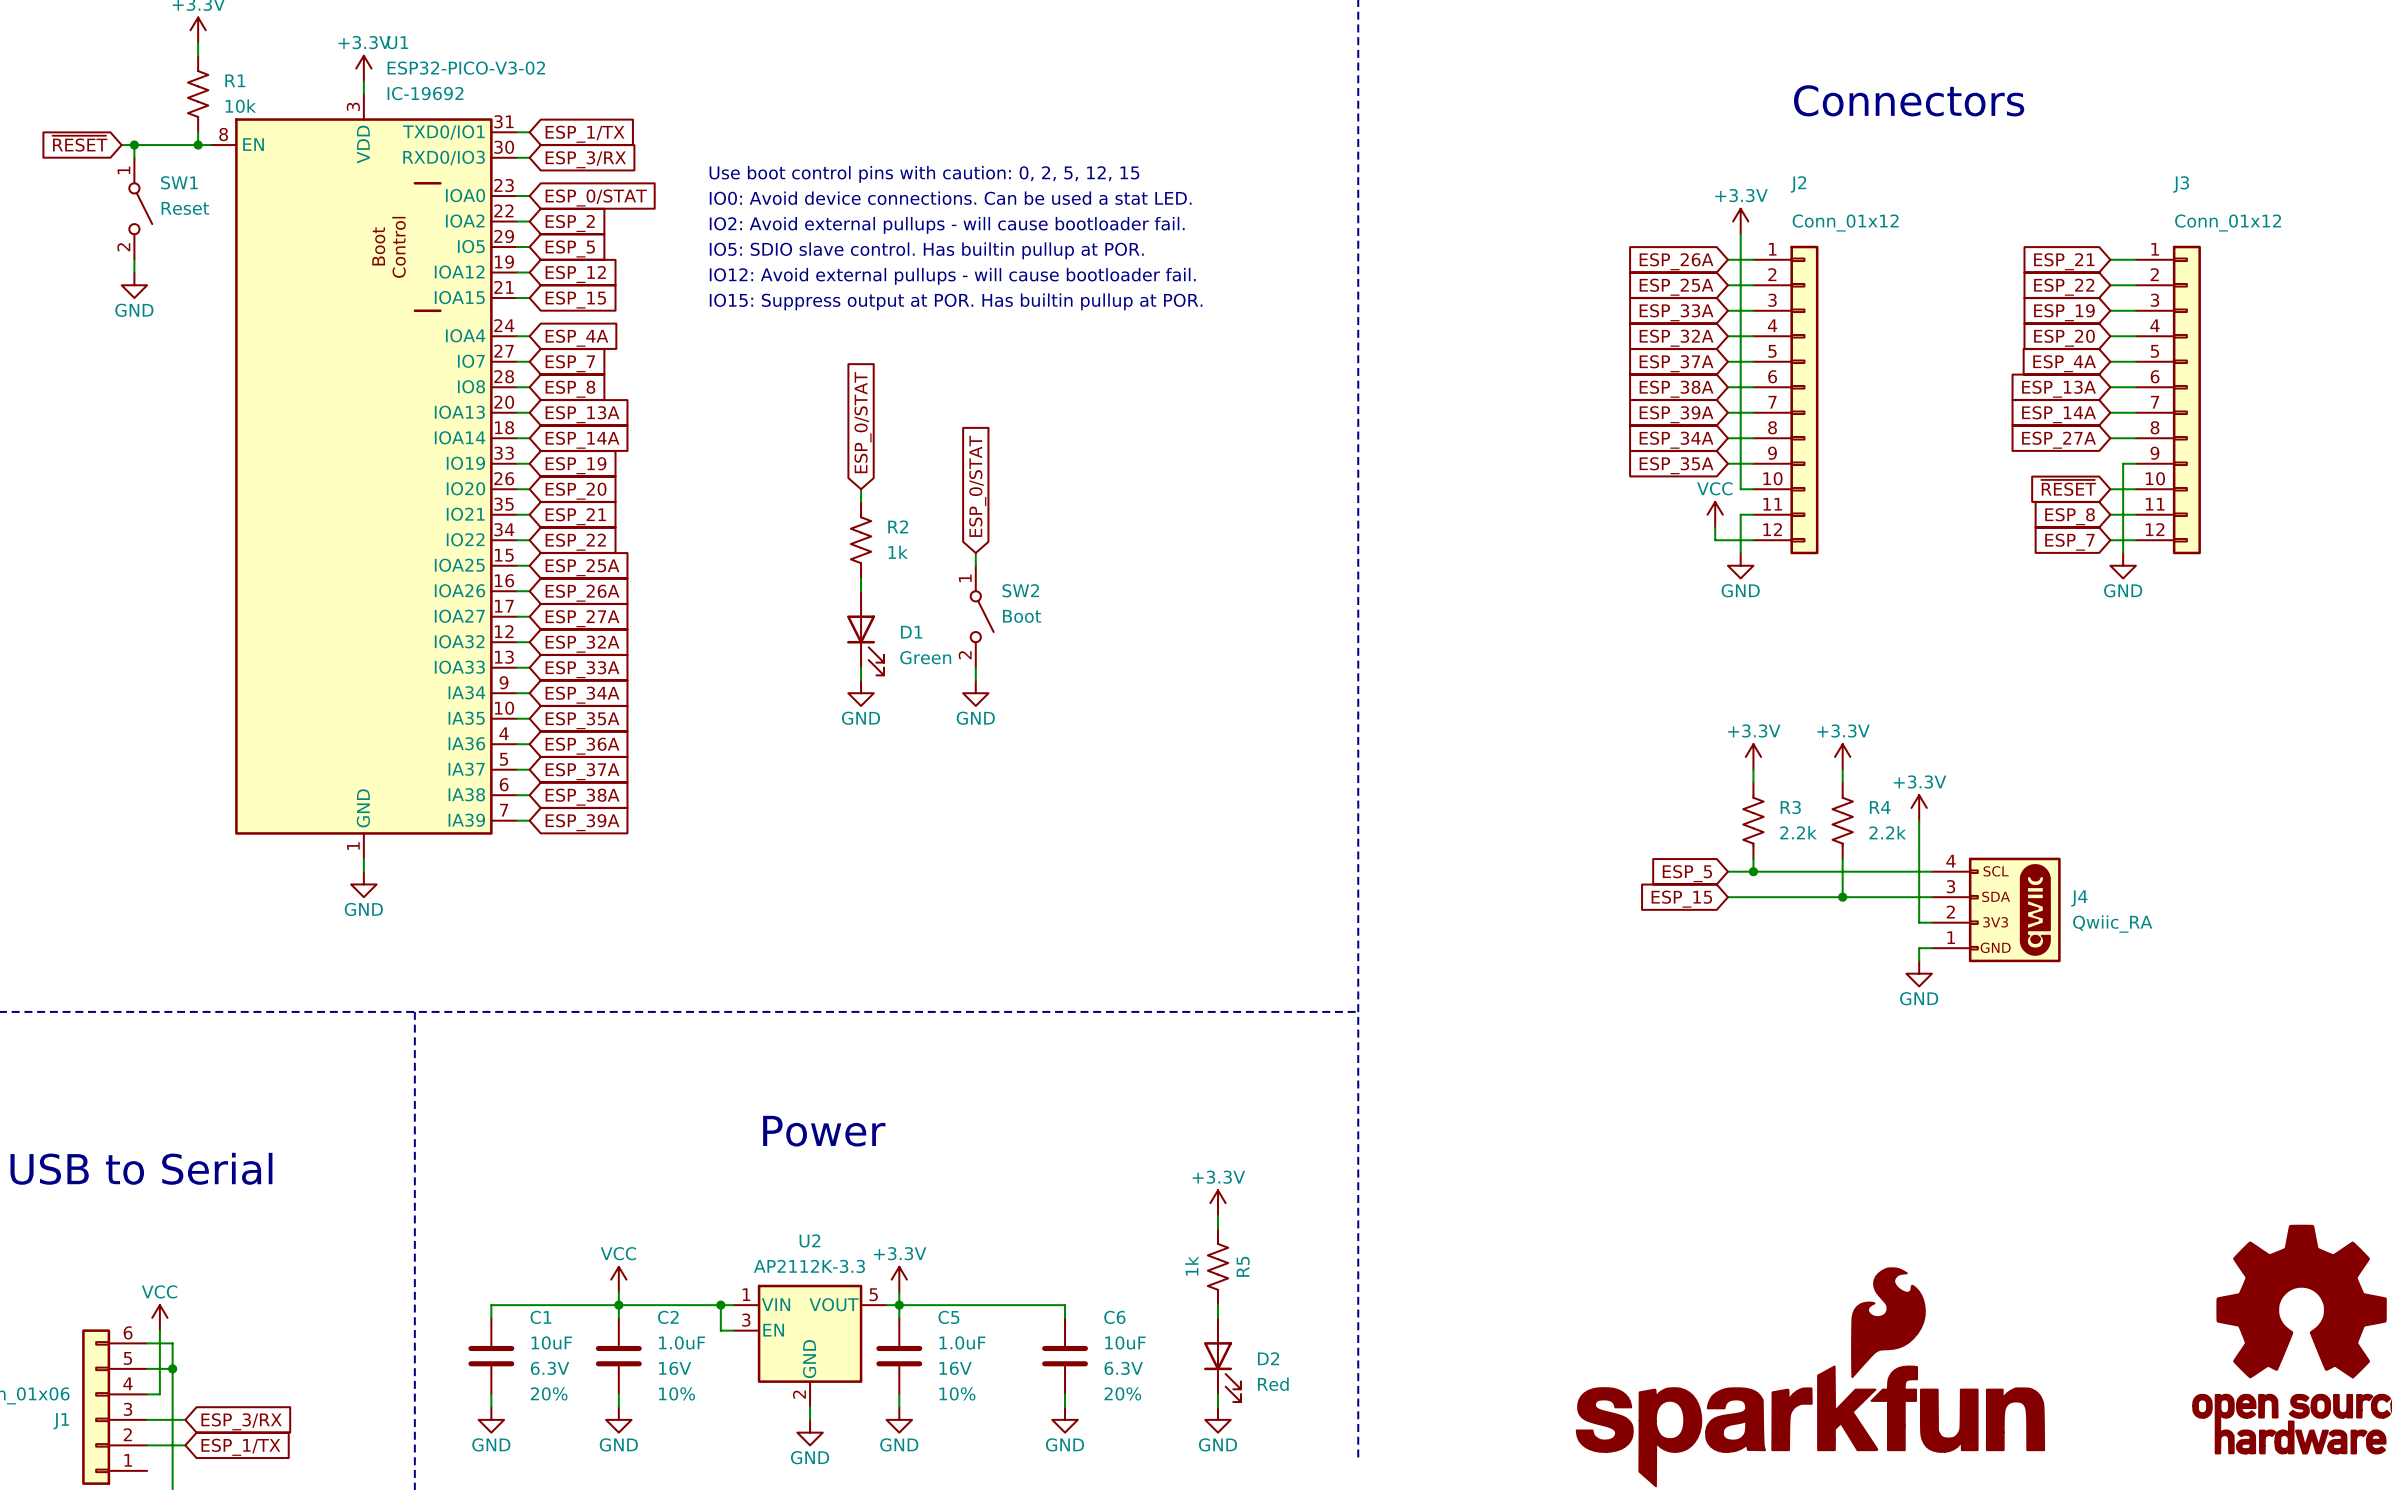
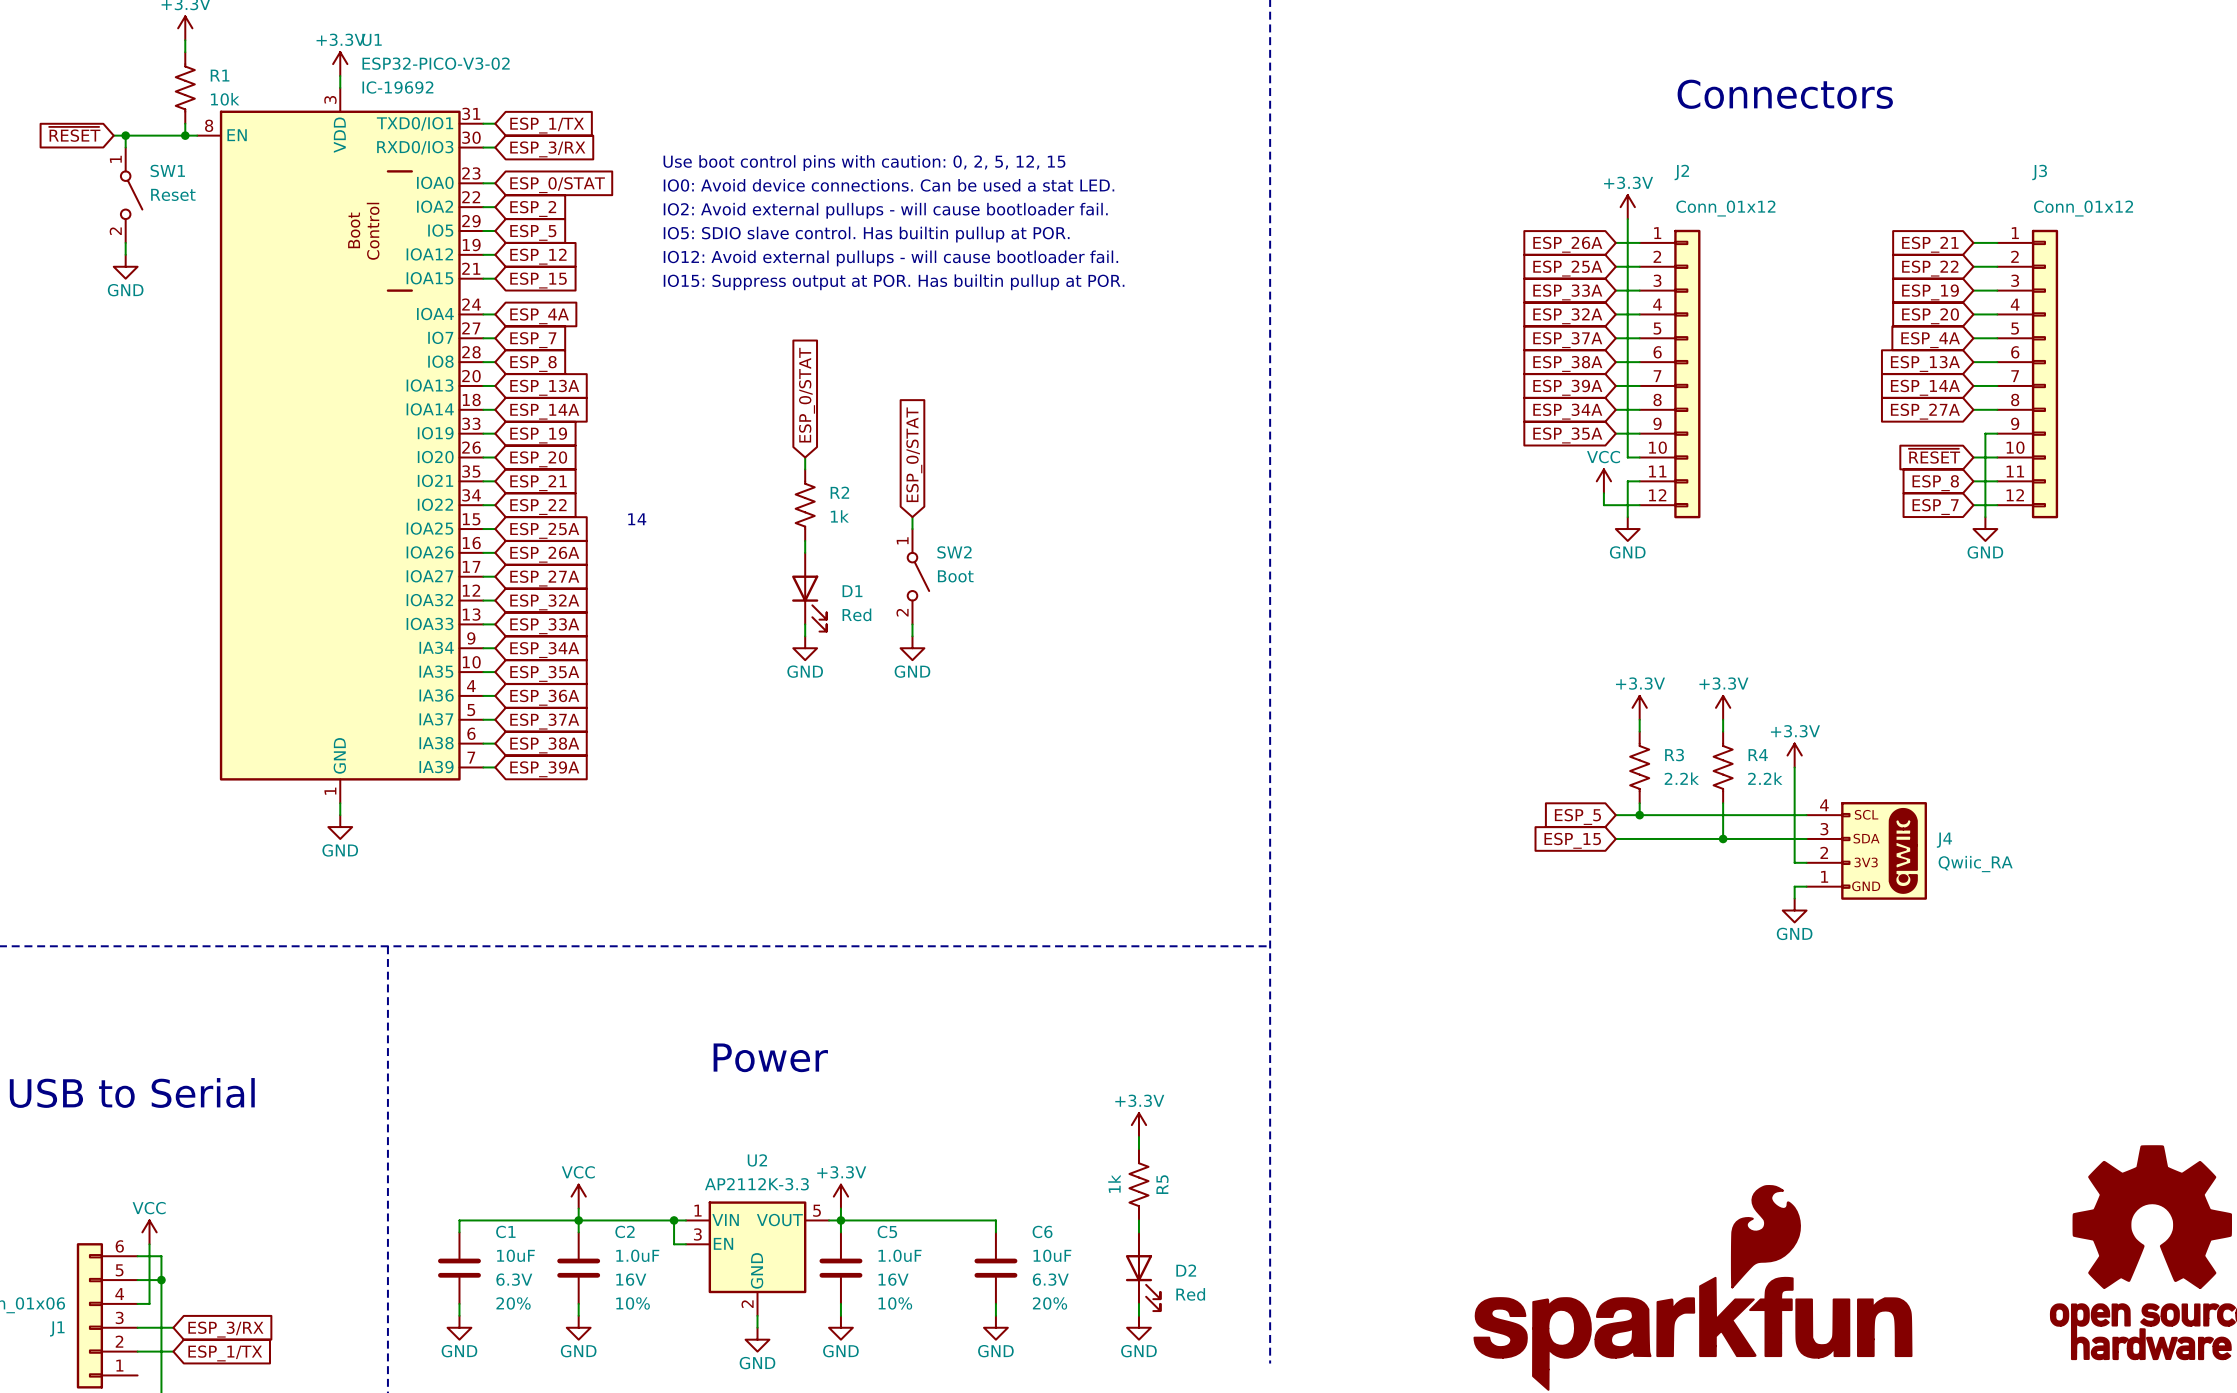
text: none -> 14 (637, 519)
D1 value: Green (925, 657) -> Red (856, 614)

